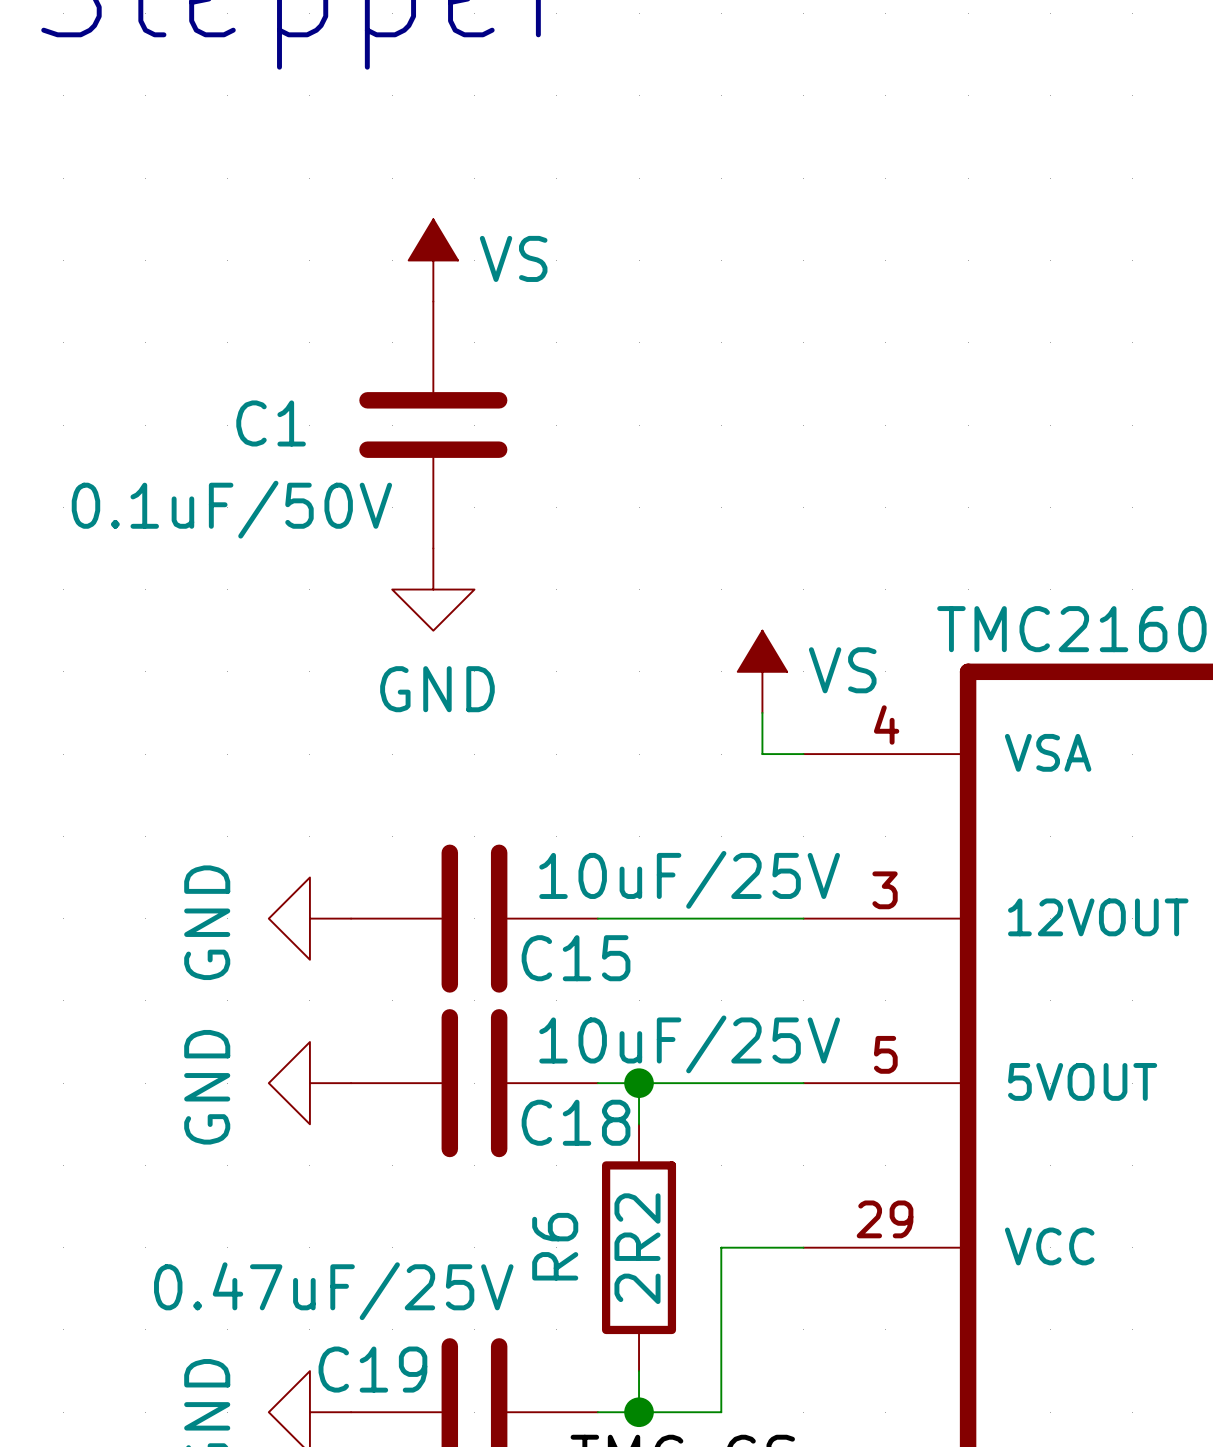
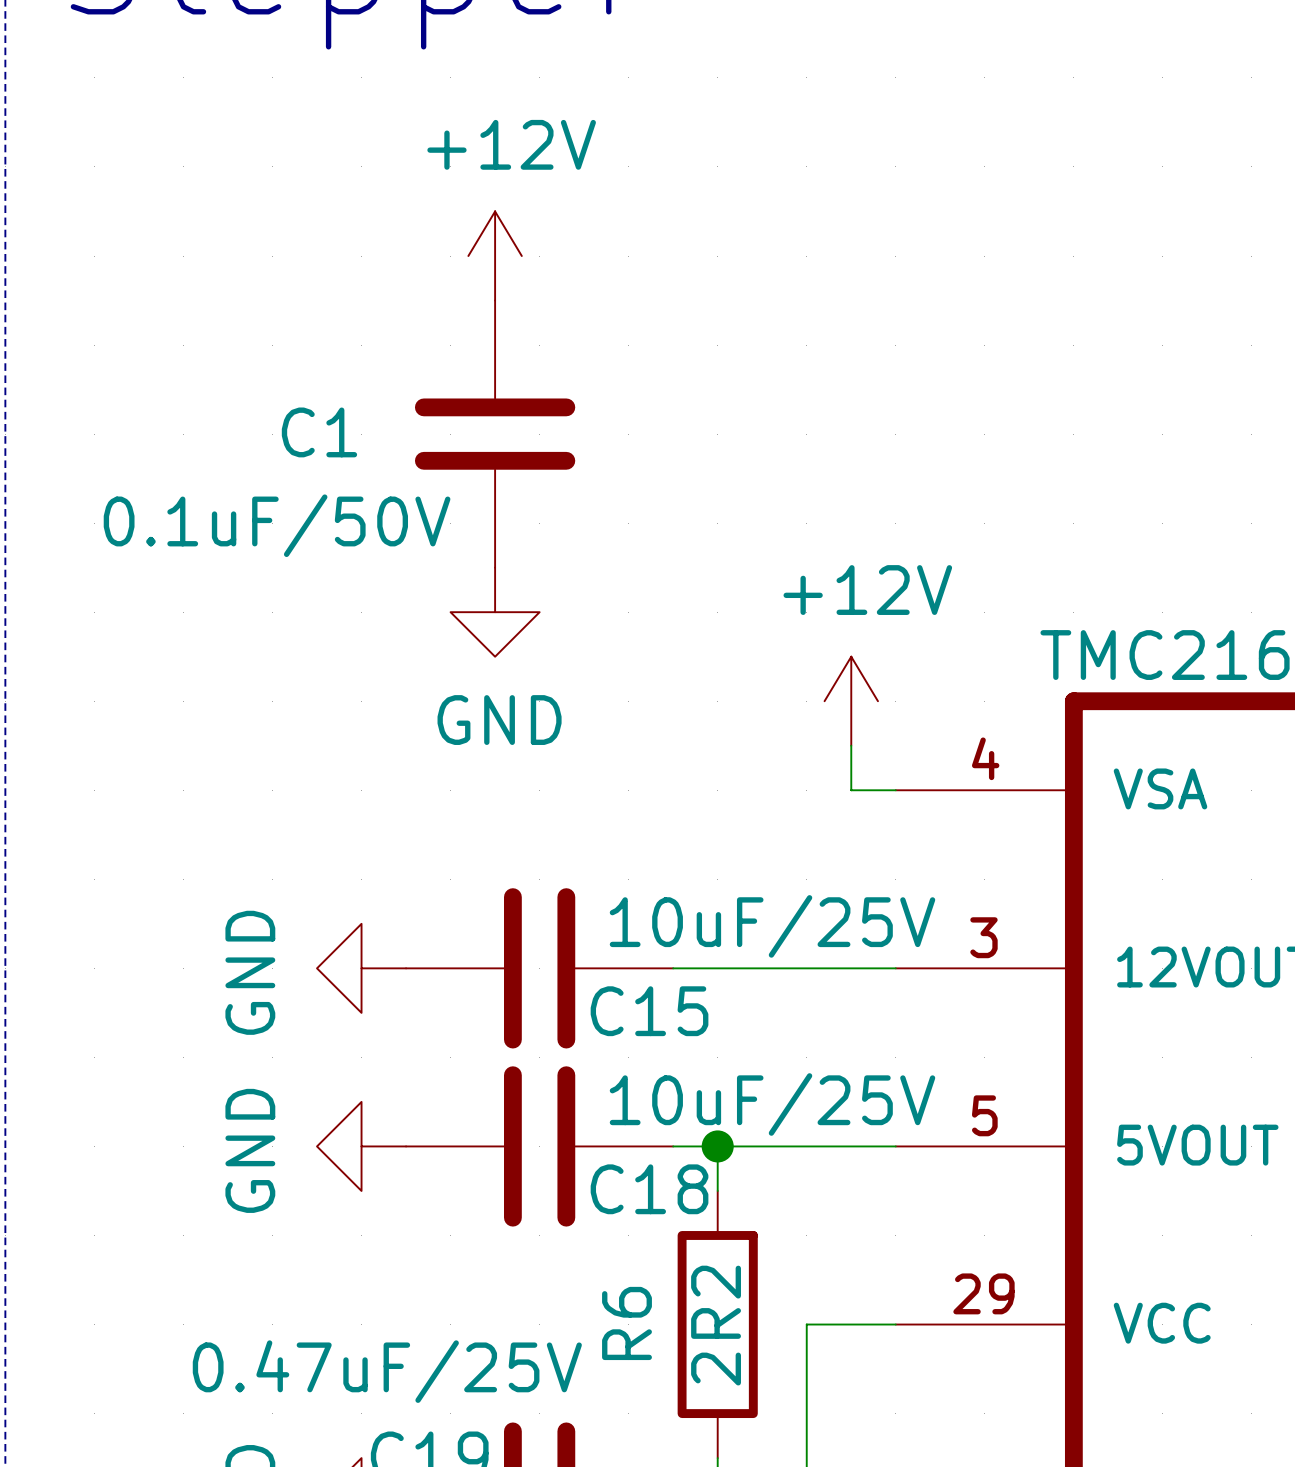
power symbol: VS (433, 260) -> +12V (495, 256)
power symbol: VS (762, 671) -> +12V (851, 701)

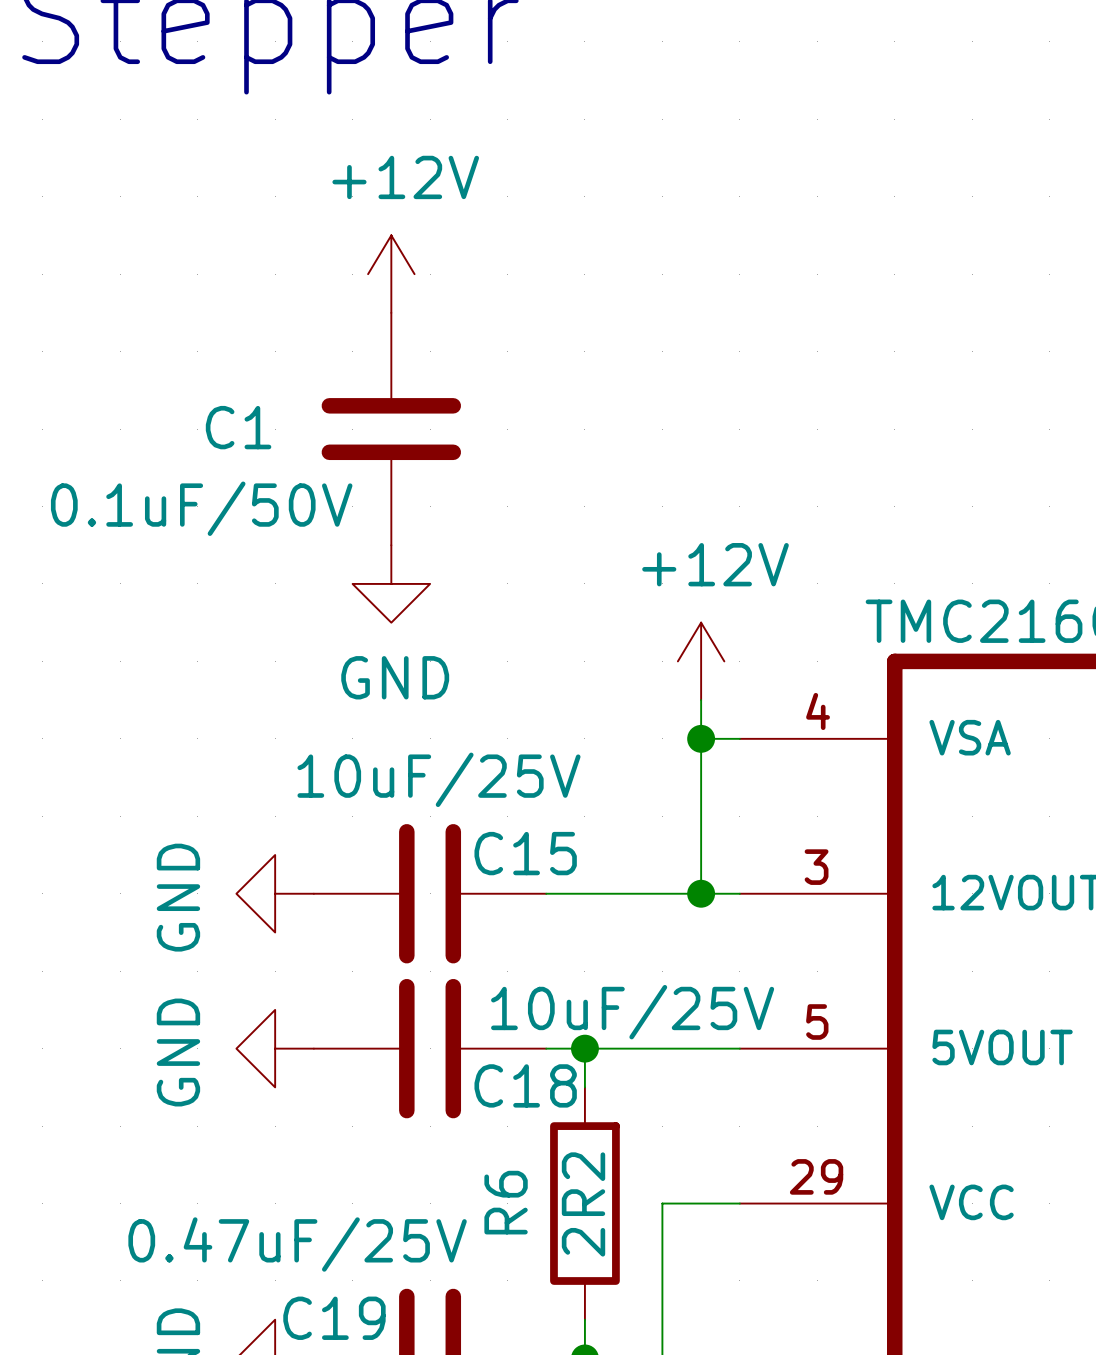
wire: none -> (701, 738) (701, 893)
junction: none -> (701, 738)
C15 value position: 10uF/25V (772, 926) -> 10uF/25V (438, 779)
junction: none -> (701, 893)
C15 name position: C15 (649, 1011) -> C15 (525, 853)

